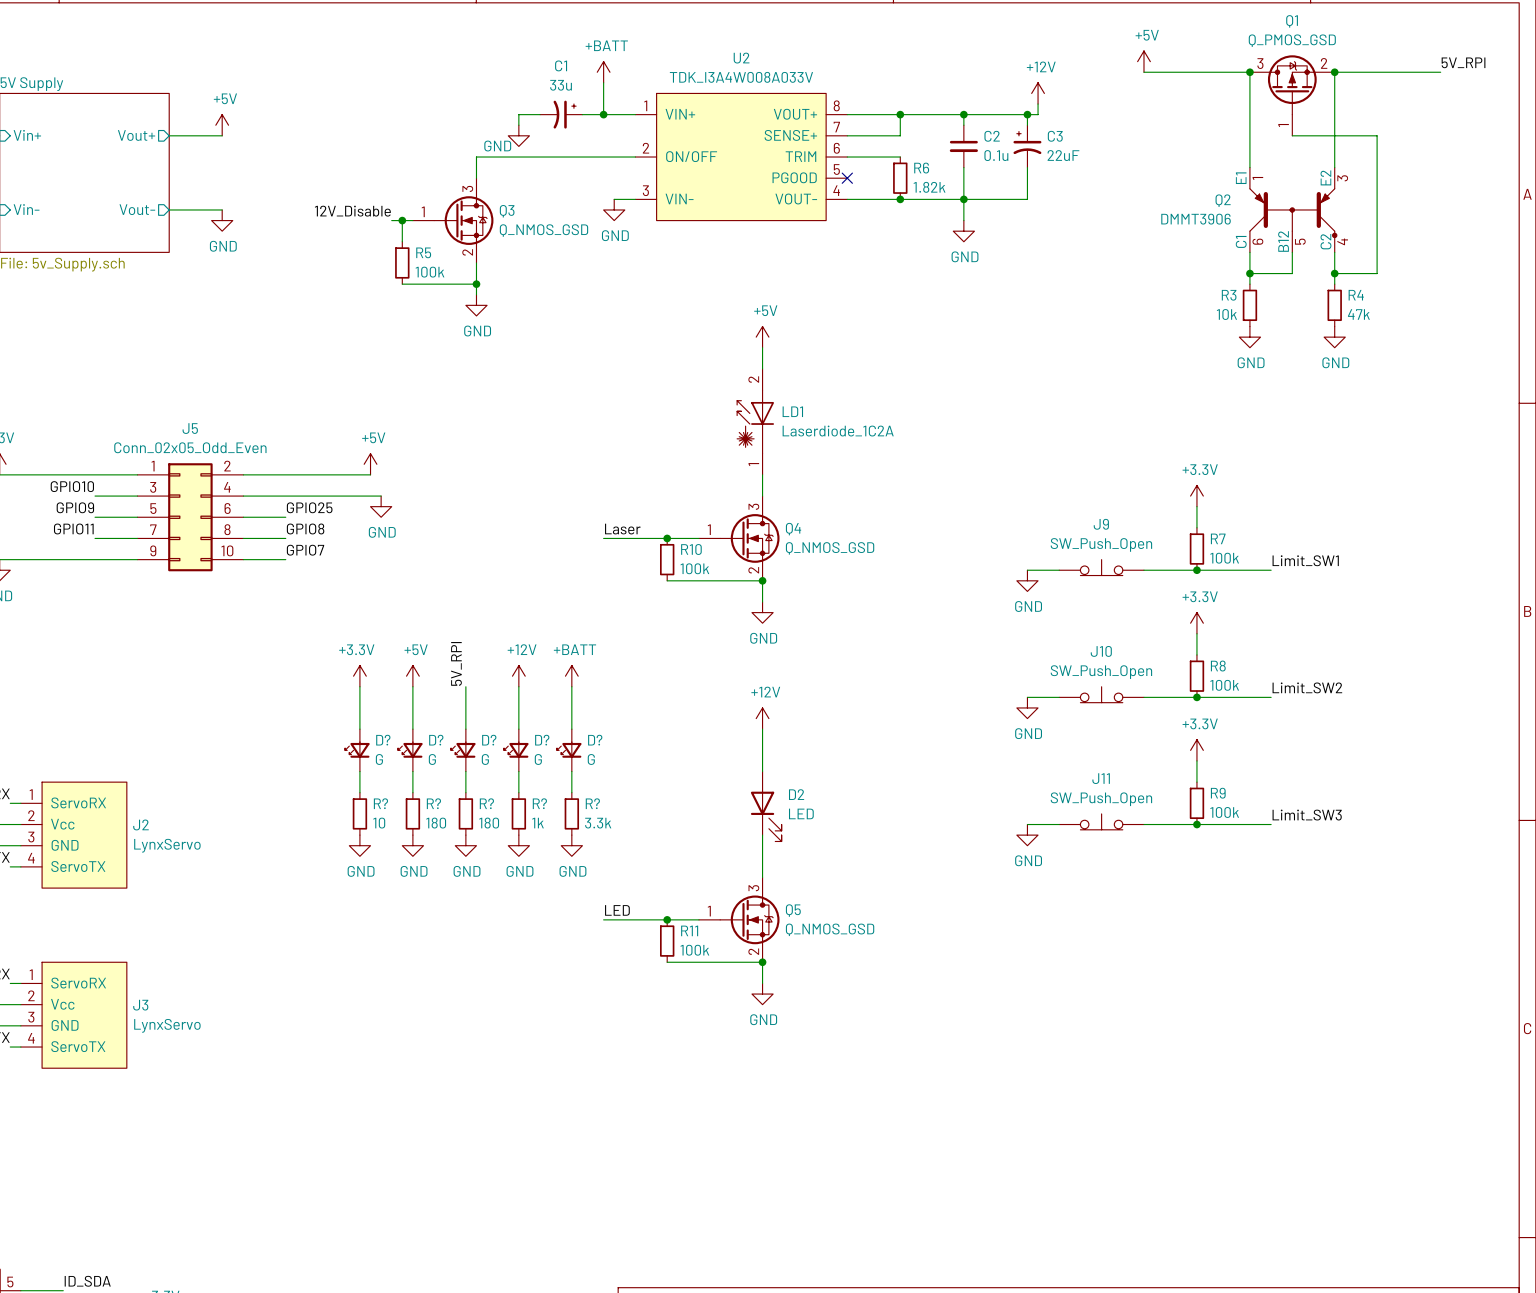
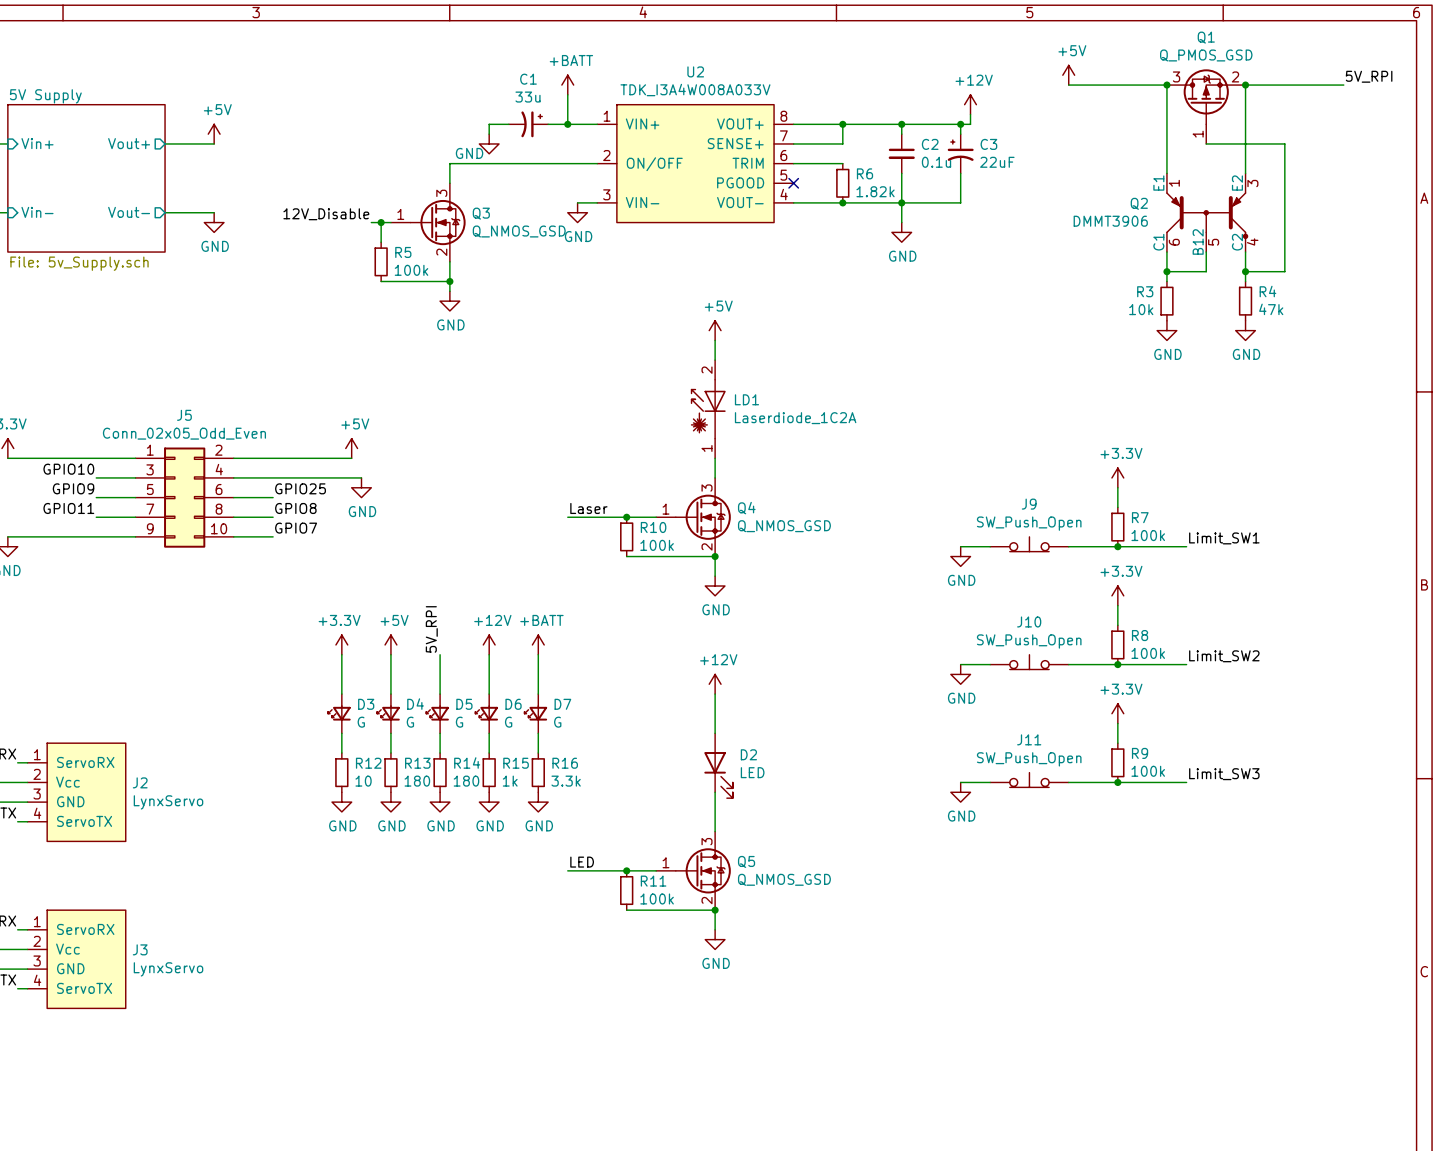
D? name: D? (383, 740) -> D3 (366, 704)
D? name: D? (436, 740) -> D4 (415, 704)
D? name: D? (489, 740) -> D5 (464, 704)
D? name: D? (542, 740) -> D6 (513, 704)
D? name: D? (595, 740) -> D7 (562, 704)
R? name: R? (380, 803) -> R12 (368, 763)
R? name: R? (433, 803) -> R13 (417, 763)
R? name: R? (486, 803) -> R14 (467, 763)
R? name: R? (539, 803) -> R15 (516, 763)
R? name: R? (592, 803) -> R16 (565, 763)

